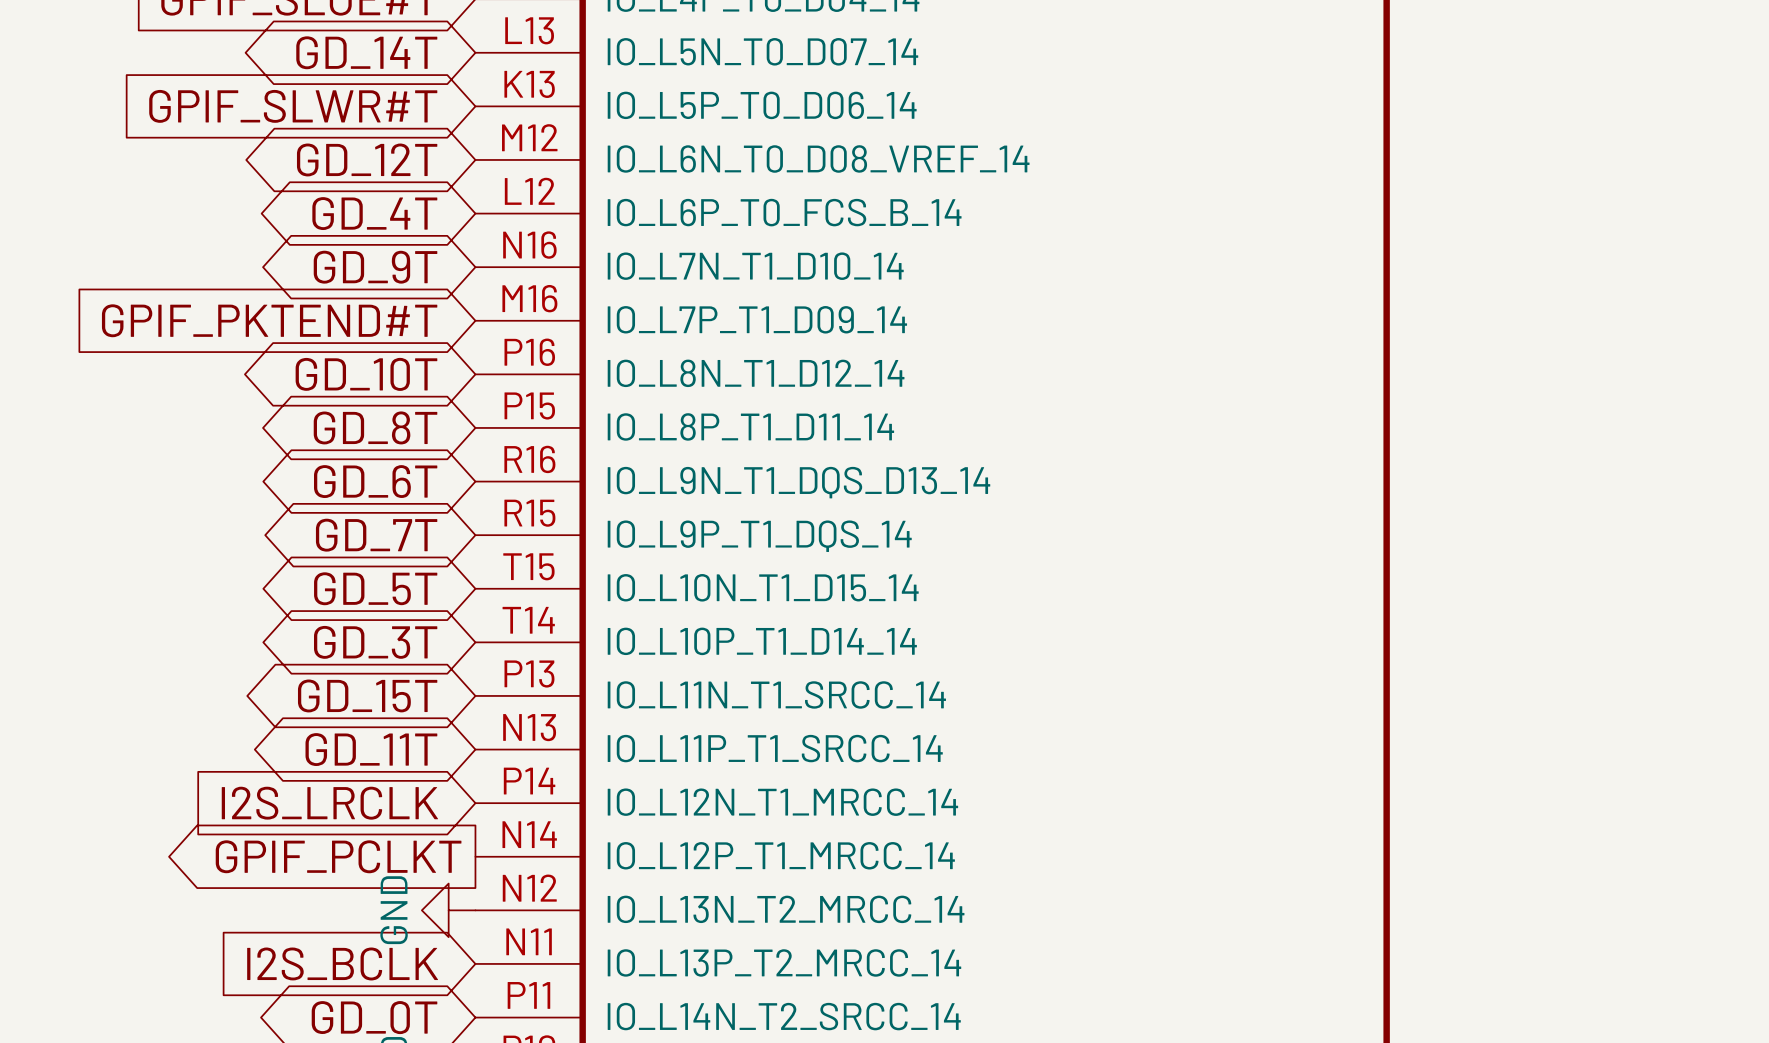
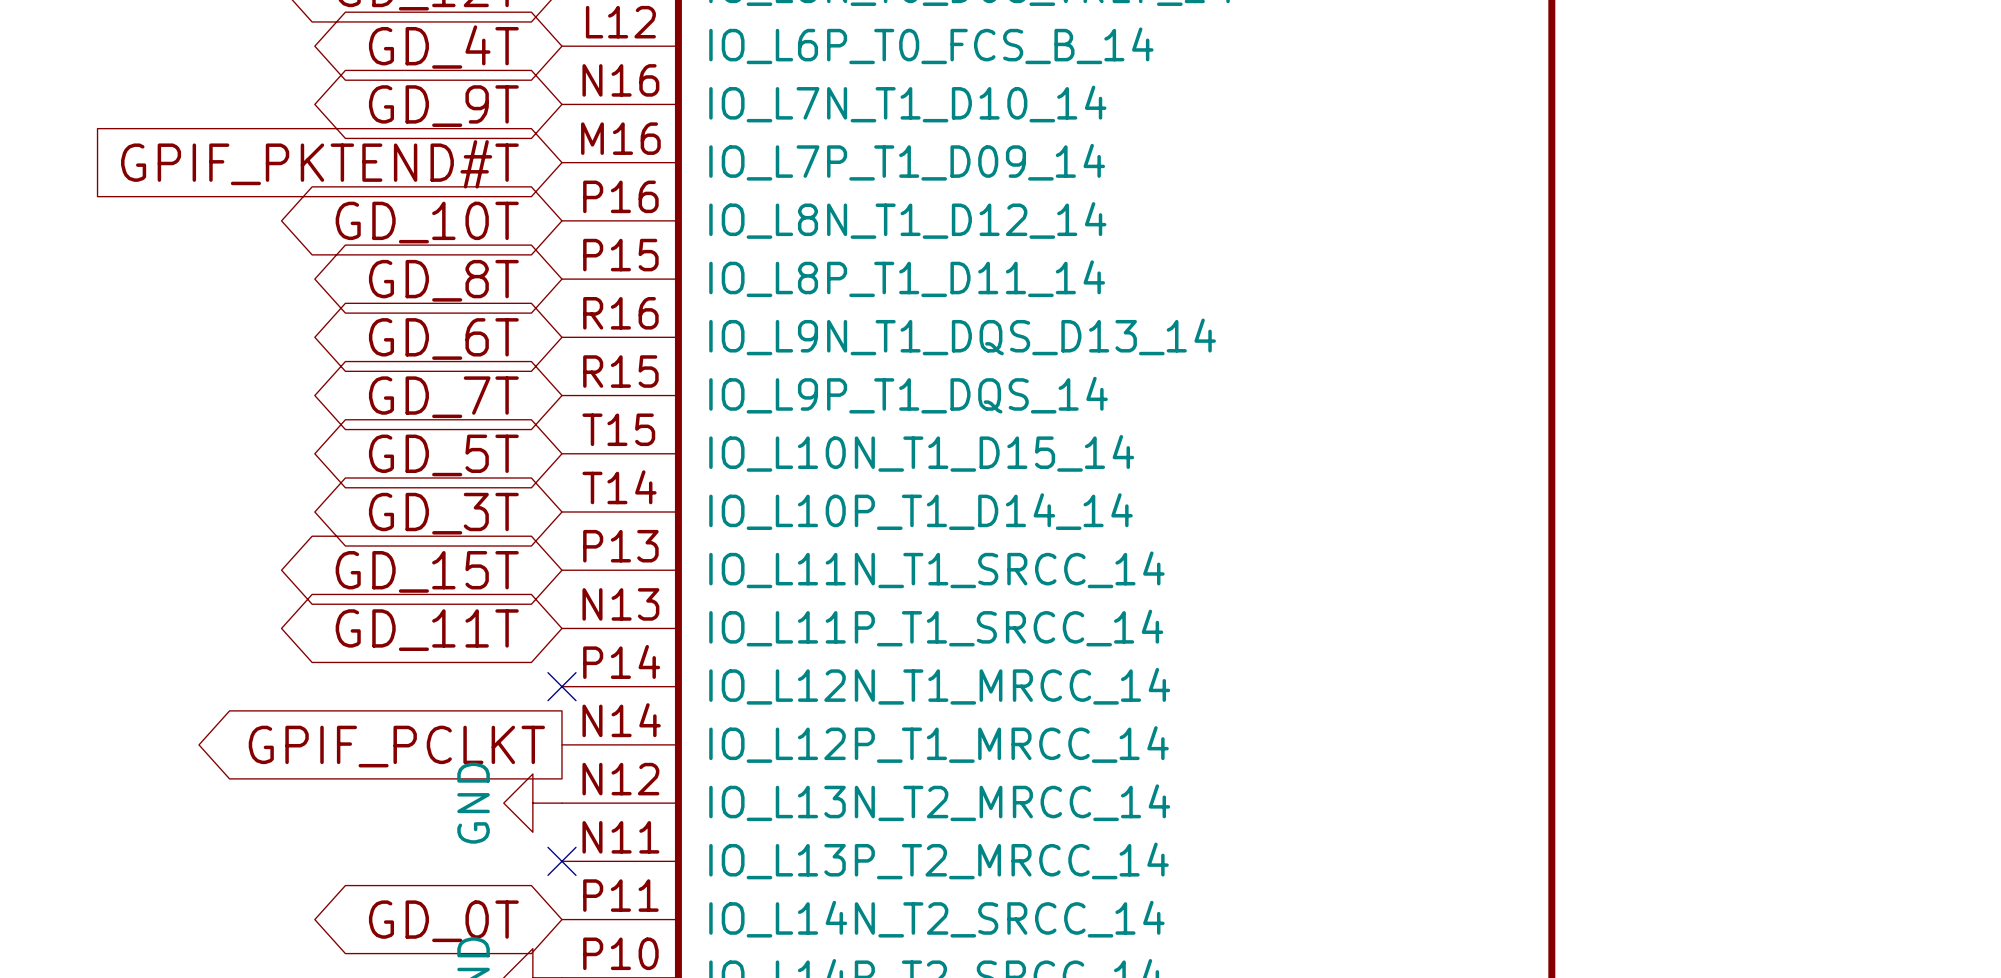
global label: I2S_LRCLK (329, 803) -> none
no-connect mark: none -> (561, 686)
global label: I2S_BCLK (342, 963) -> none
no-connect mark: none -> (561, 861)

